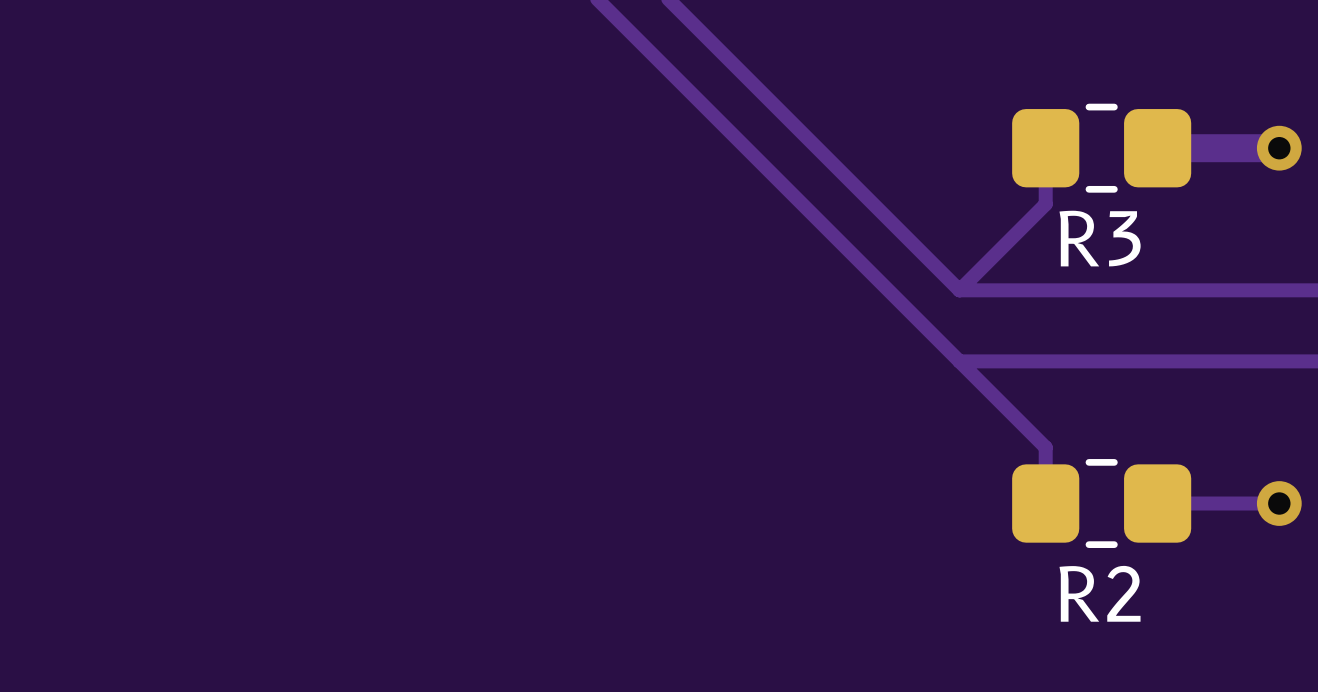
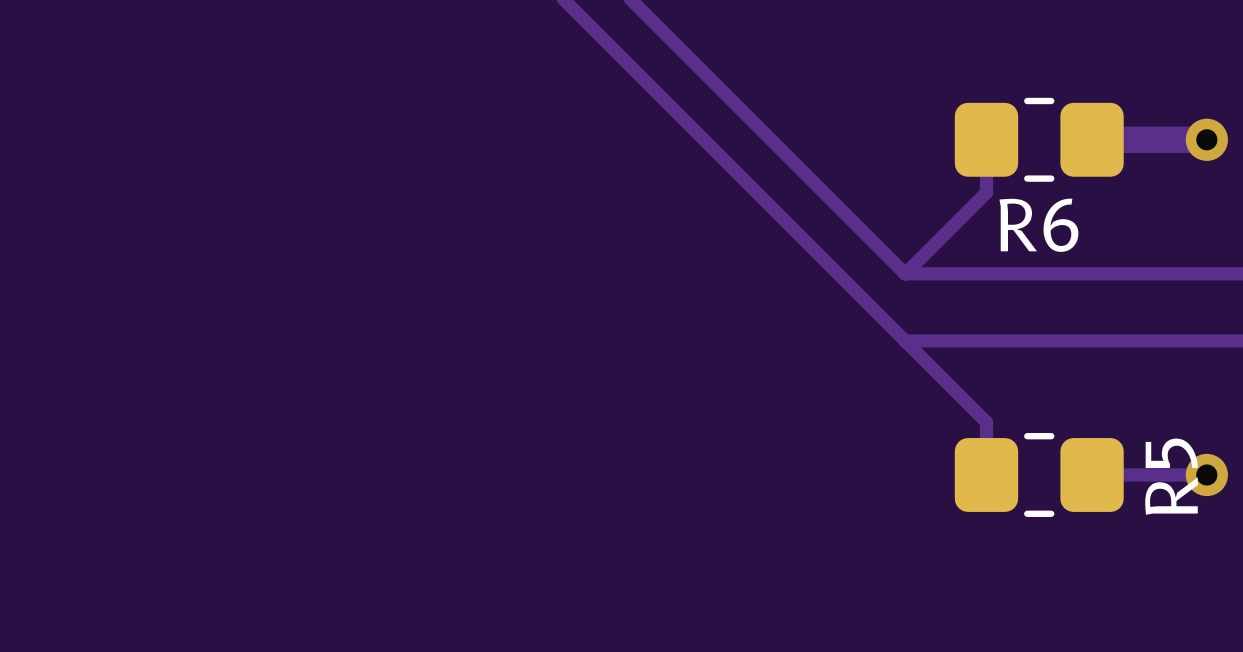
R3 name: R3 (1100, 238) -> R6 (1038, 225)
R2 name: R2 (1100, 593) -> R5 (1171, 476)

